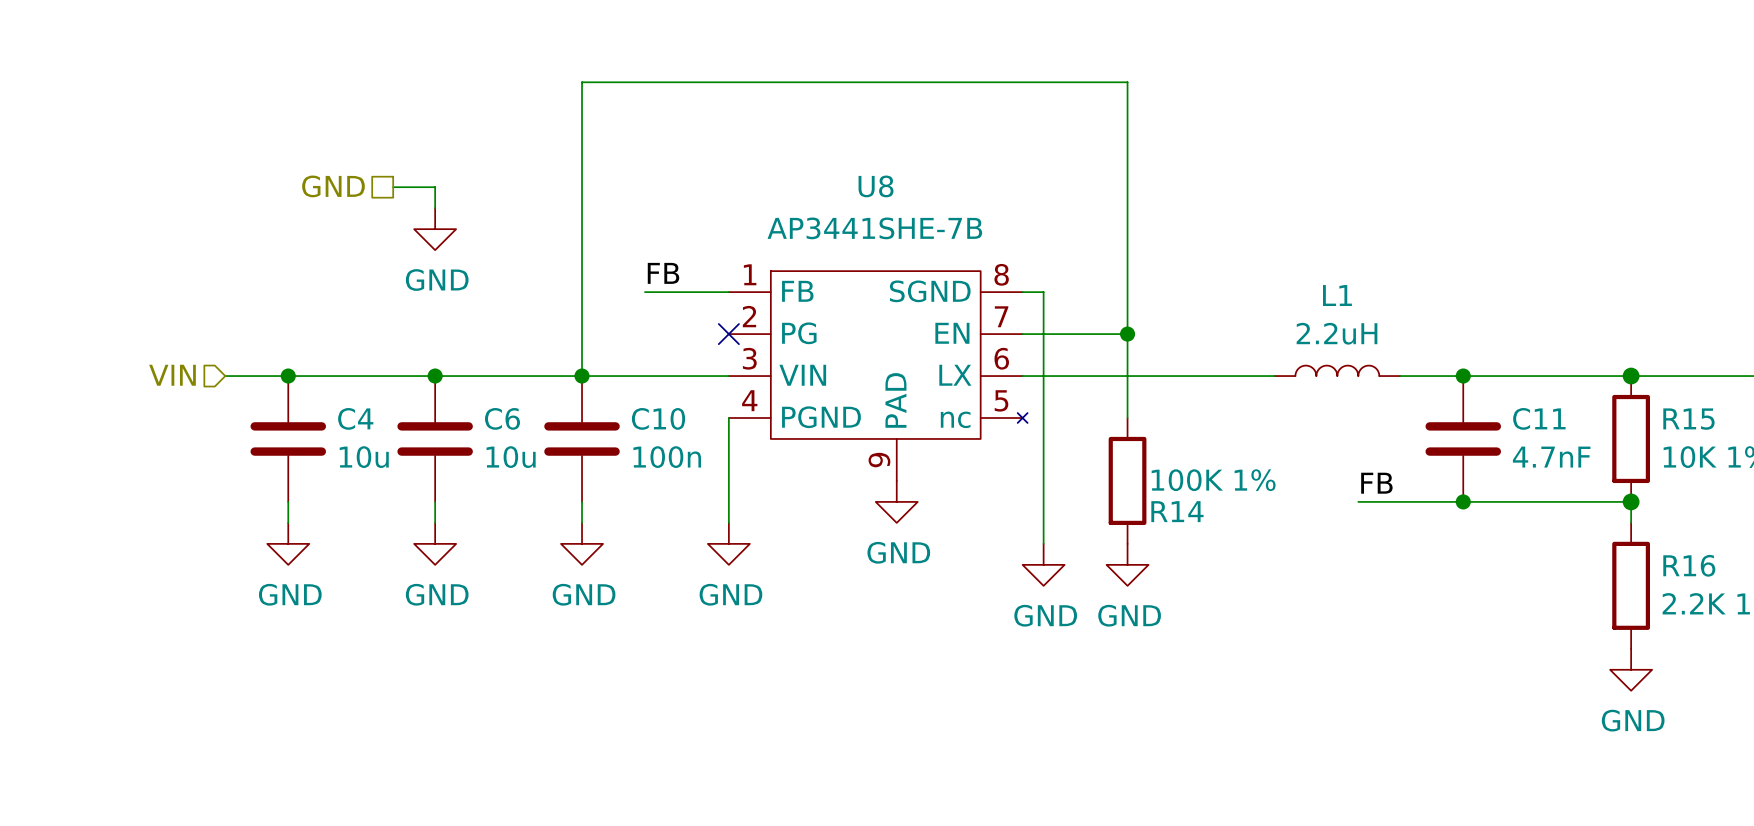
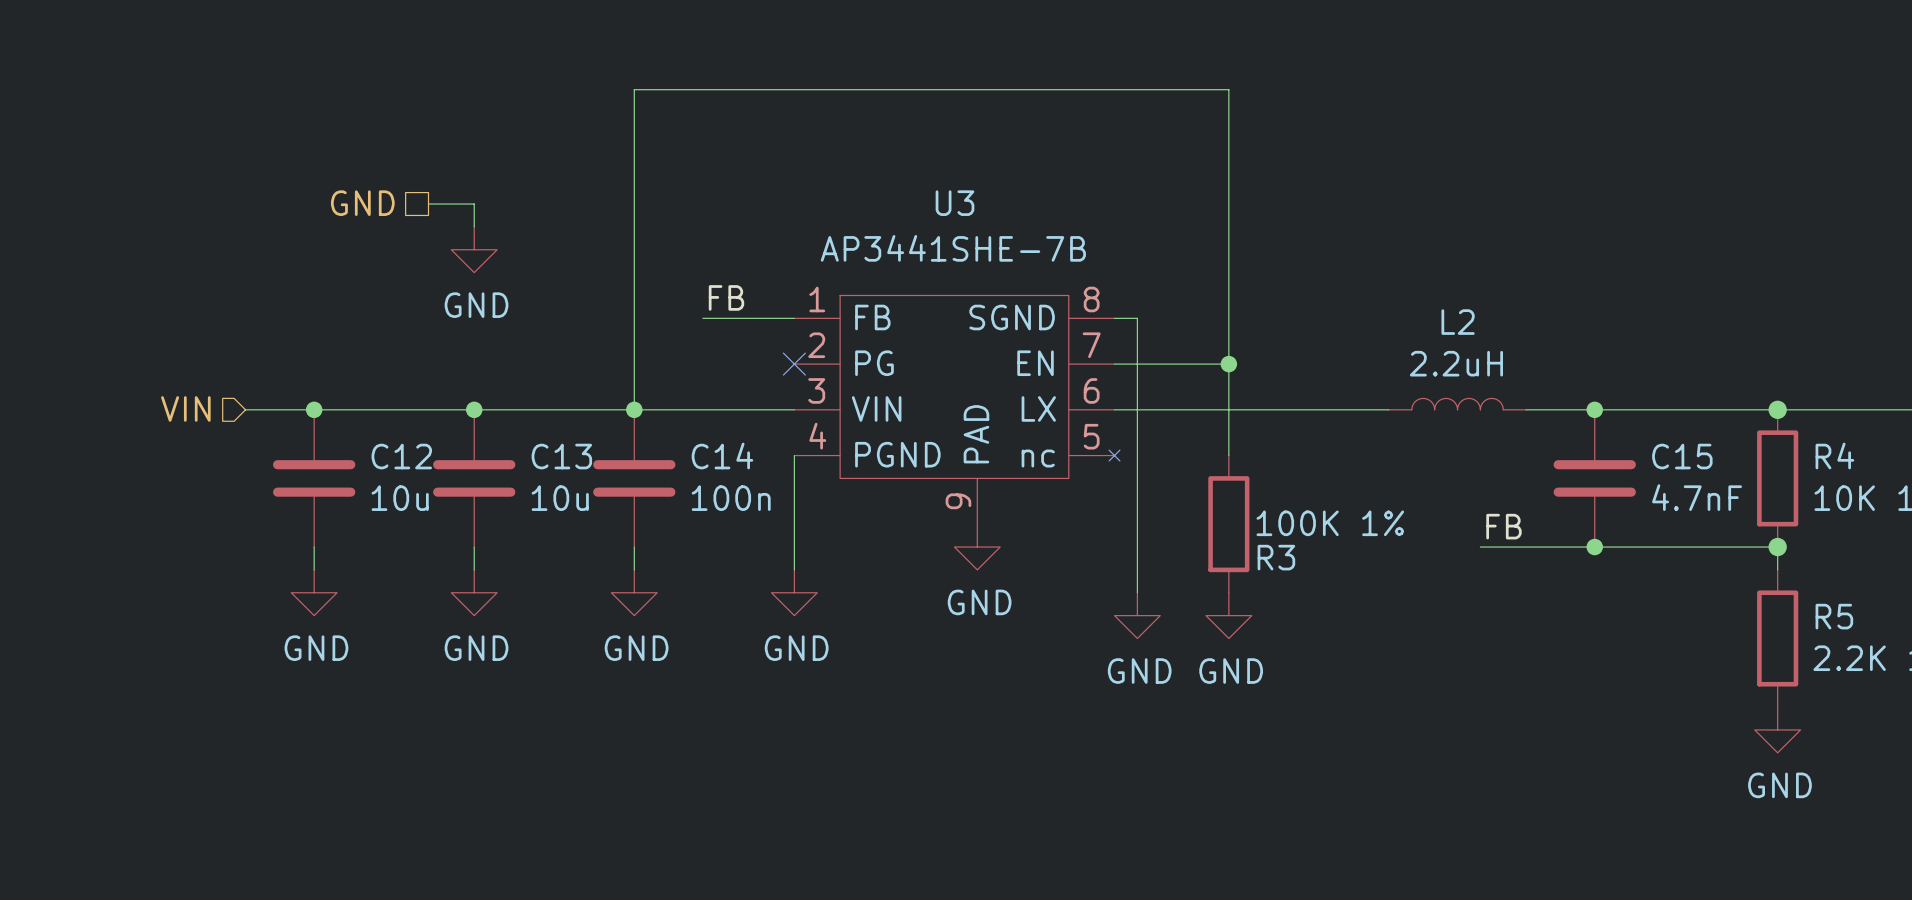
U8 name: U8 (876, 186) -> U3 (954, 203)
L1 name: L1 (1337, 295) -> L2 (1458, 322)
C4 name: C4 (355, 418) -> C12 (401, 456)
C6 name: C6 (502, 418) -> C13 (561, 456)
C10 name: C10 (658, 418) -> C14 (722, 455)
C11 name: C11 (1539, 418) -> C15 (1682, 456)
R15 name: R15 (1688, 419) -> R4 (1834, 455)
R14 name: R14 (1177, 511) -> R3 (1276, 557)
R16 name: R16 (1689, 565) -> R5 (1834, 616)

